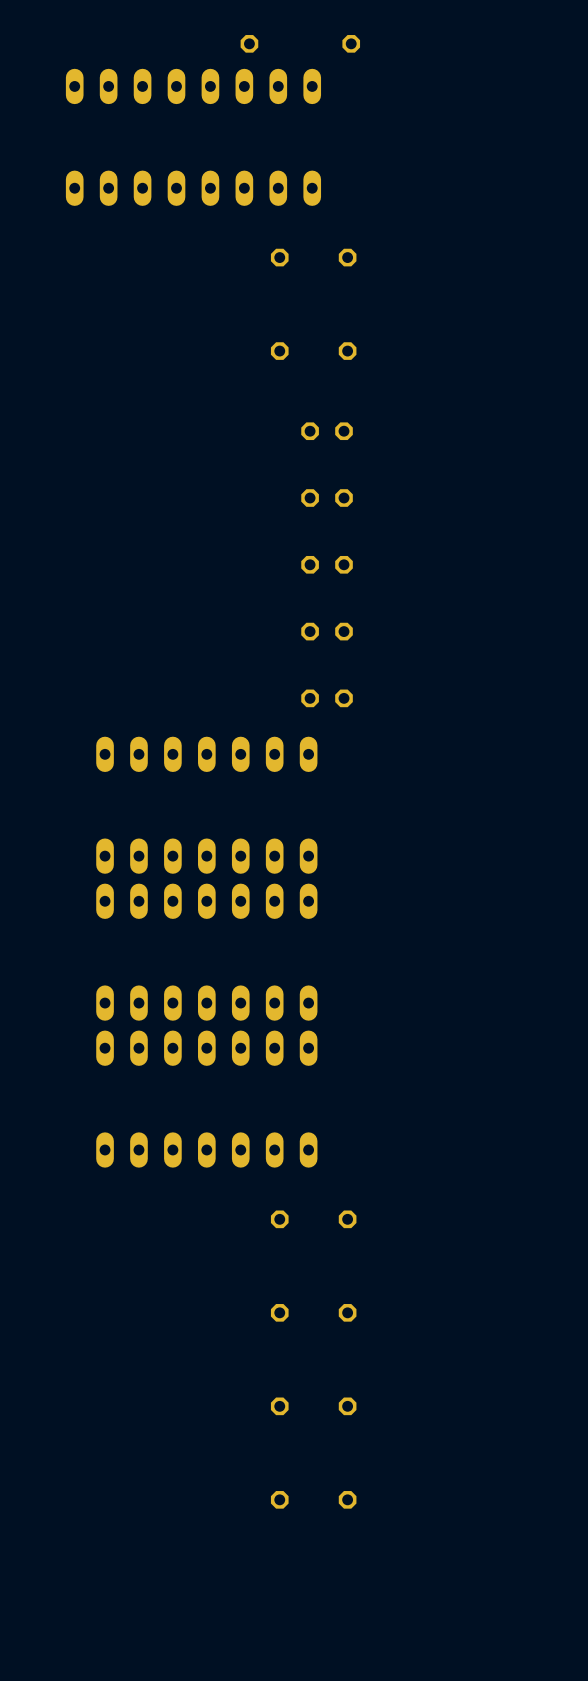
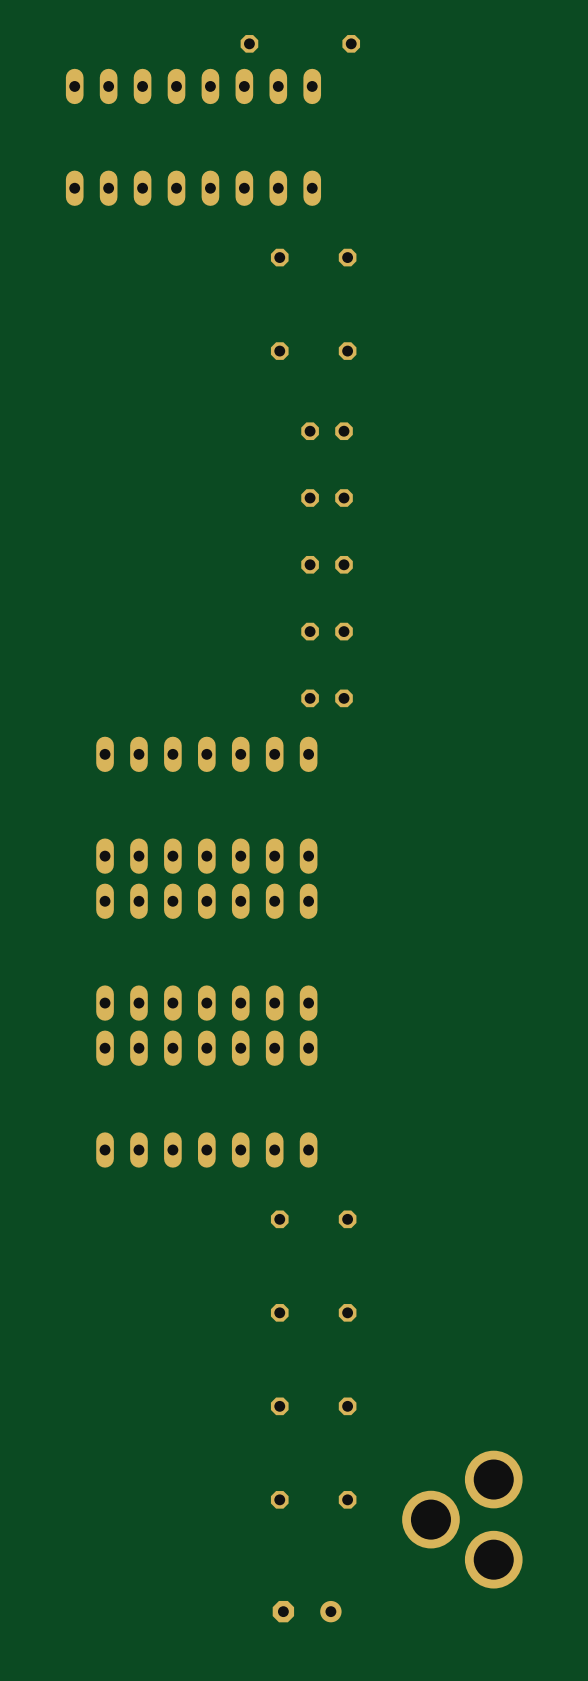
part: none -> (462, 1519)
part: none -> (307, 1611)

